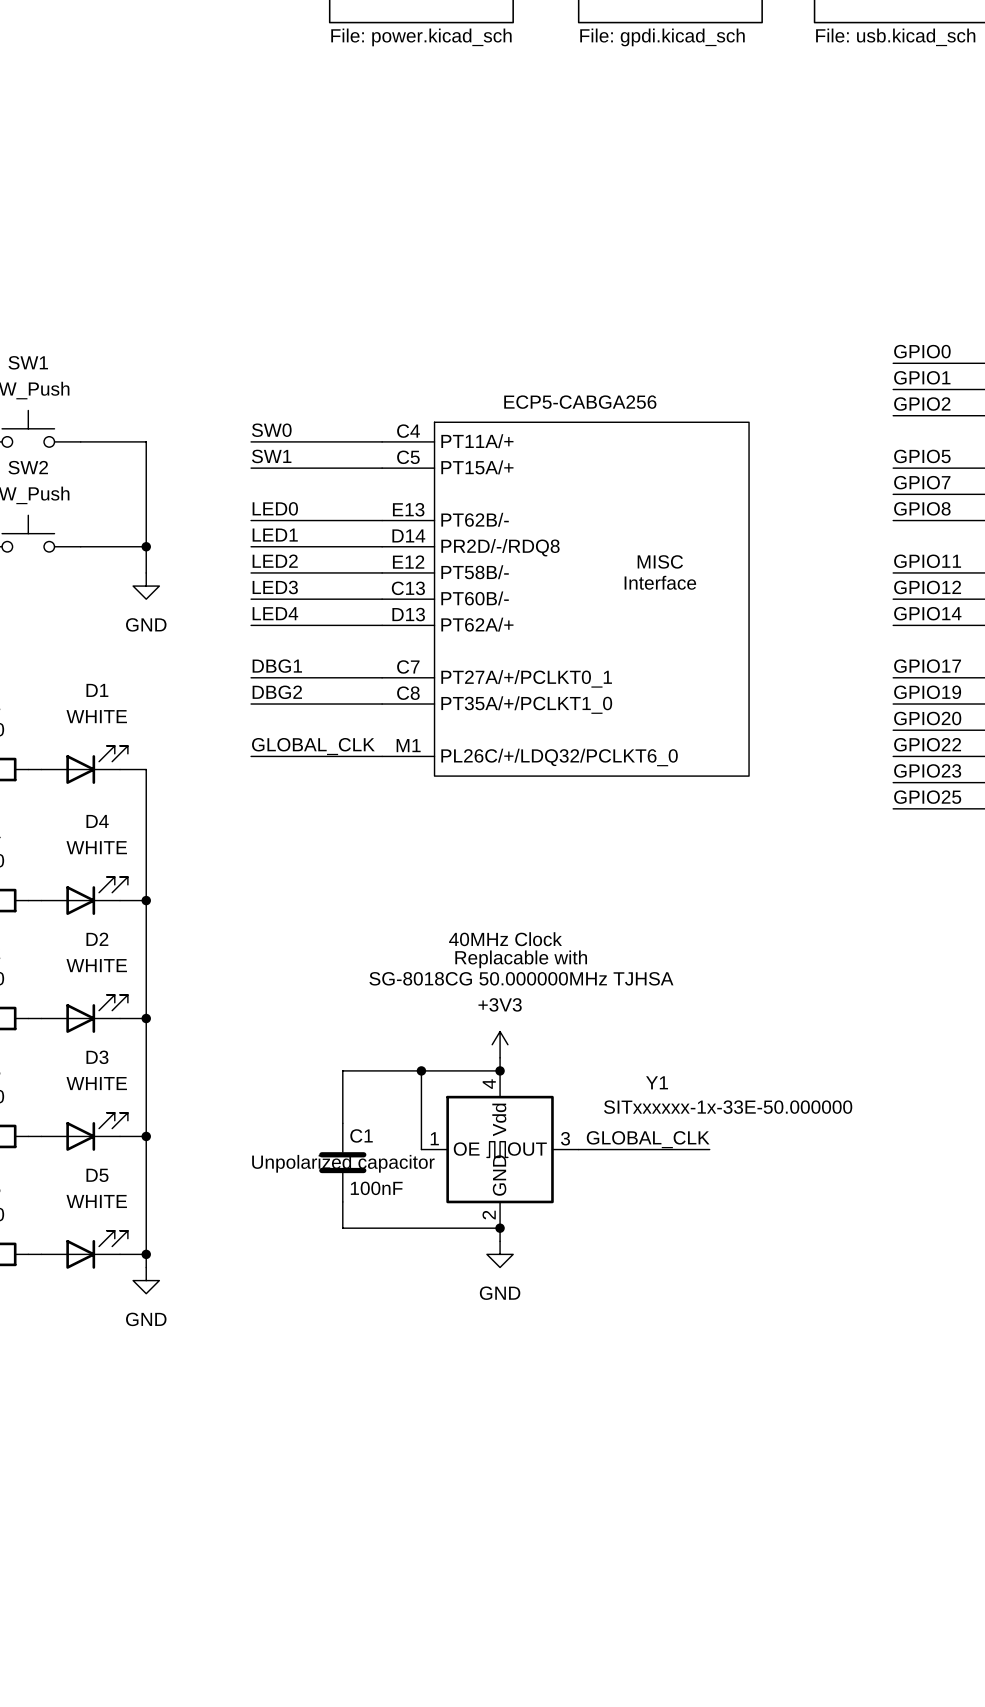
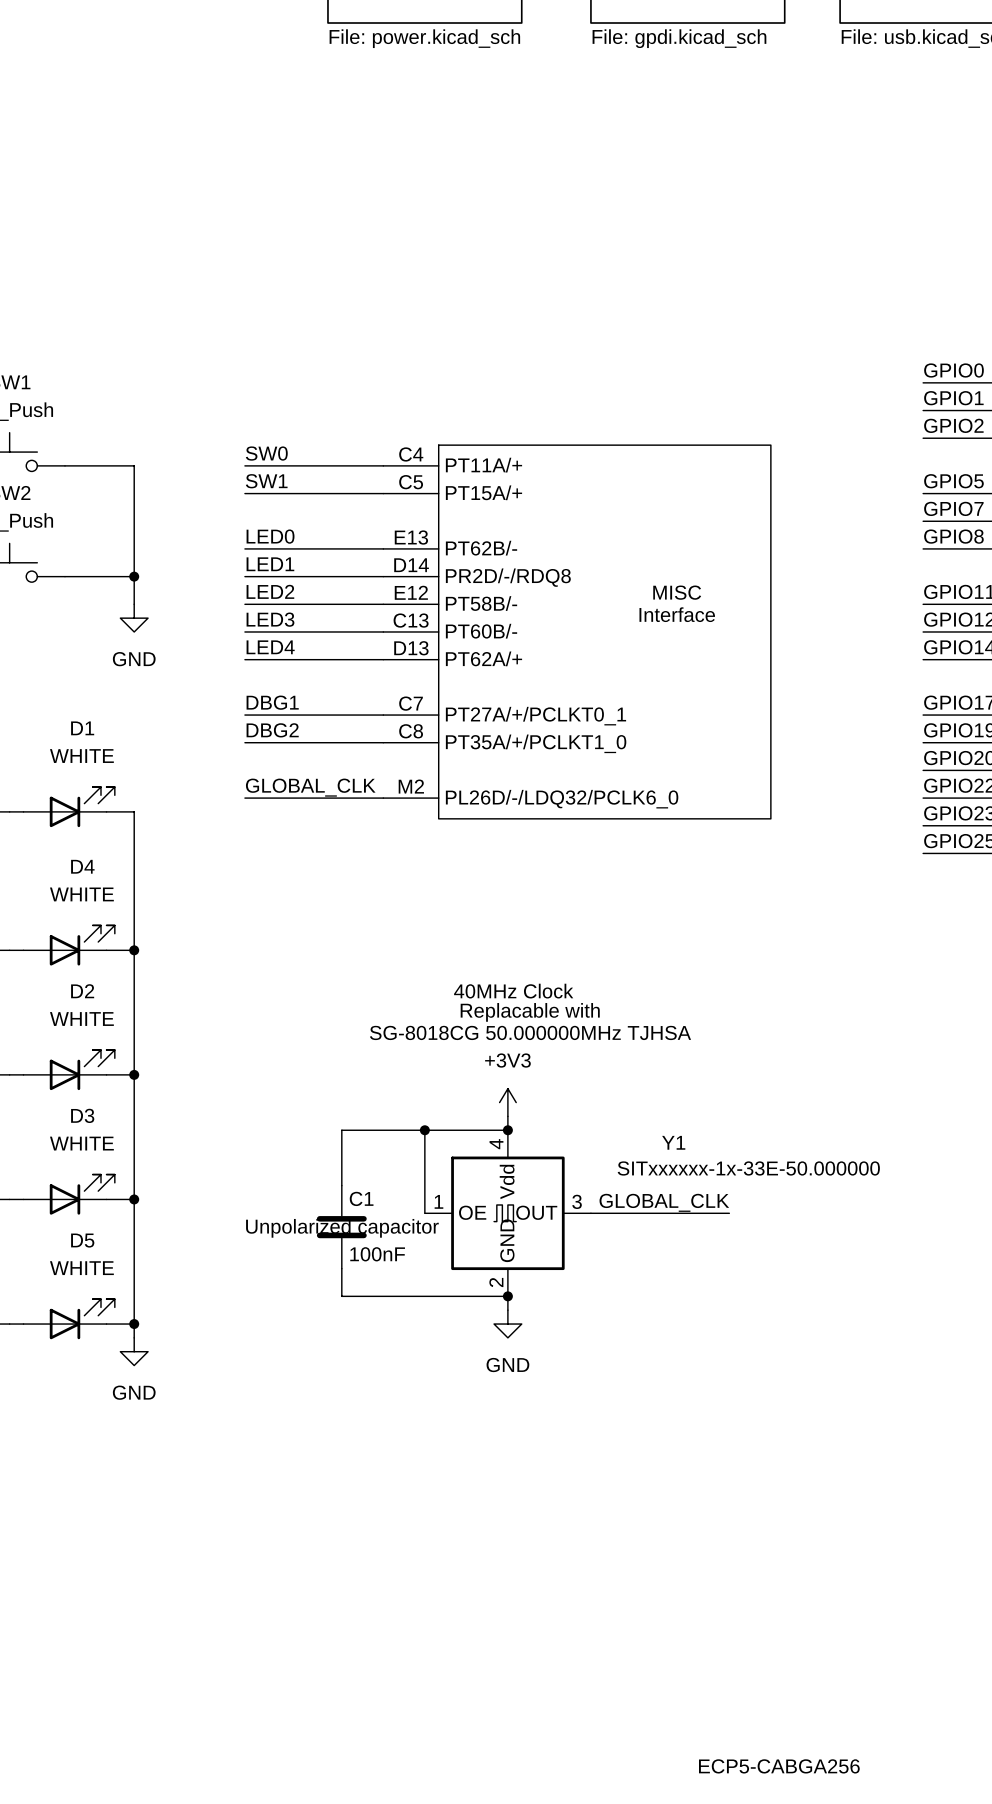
part value position: ECP5-CABGA256 (580, 402) -> ECP5-CABGA256 (779, 1766)
part pin number: M1 (408, 745) -> M2 (411, 786)
part pin name: PL26C/+/LDQ32/PCLKT6_0 (559, 757) -> PL26D/-/LDQ32/PCLK6_0 (562, 799)

